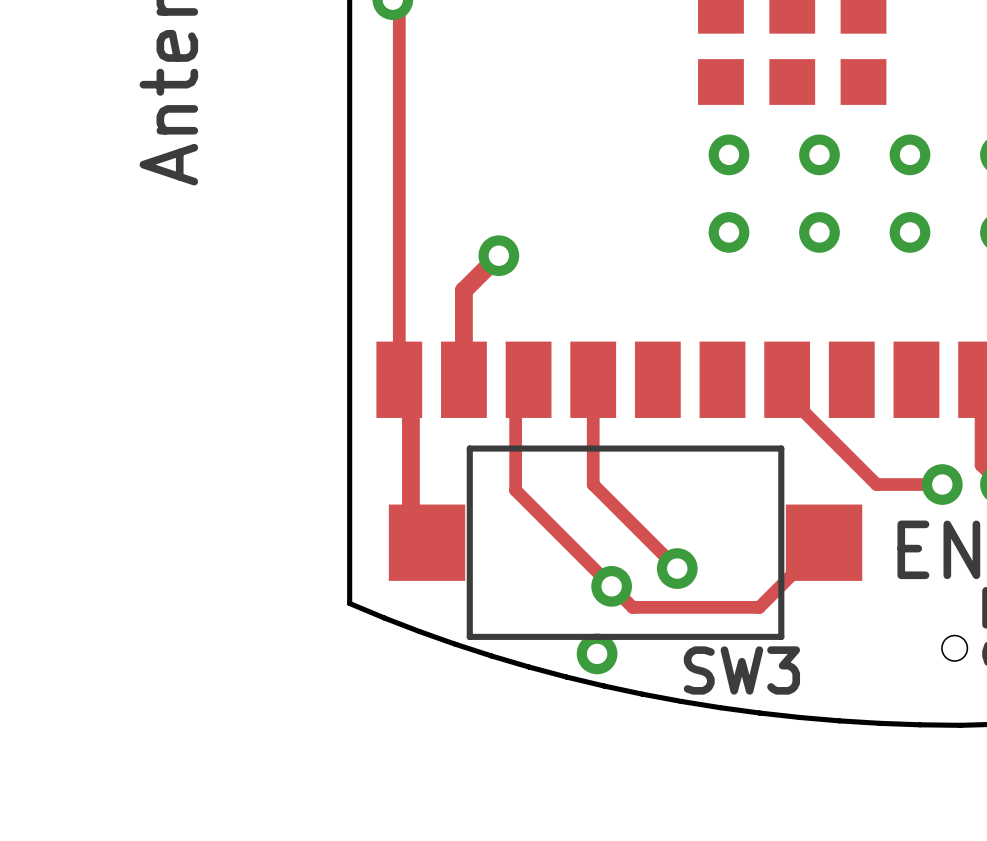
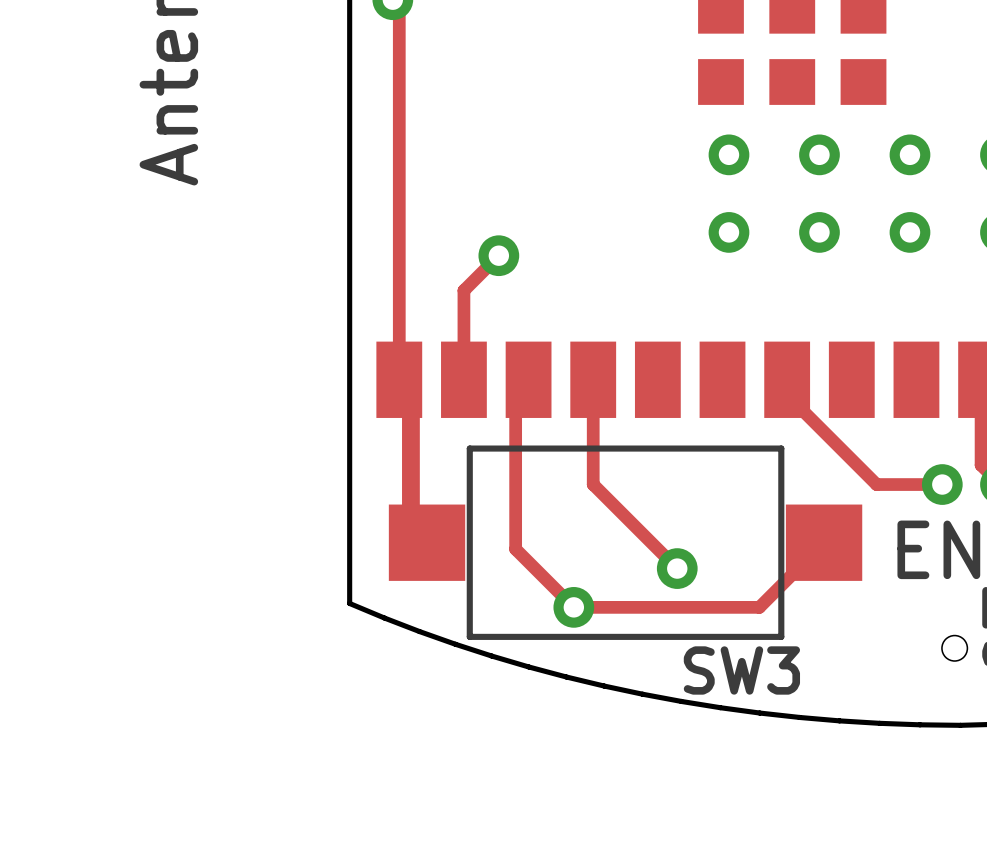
track width: thick (496, 258) (463, 290) (463, 379) -> thin (496, 258) (463, 290) (463, 379)
track: (515, 490) (632, 607) -> (515, 490) (515, 549) (573, 607) (632, 607)
via position: (611, 586) -> (573, 607)
via: (597, 653) -> none

